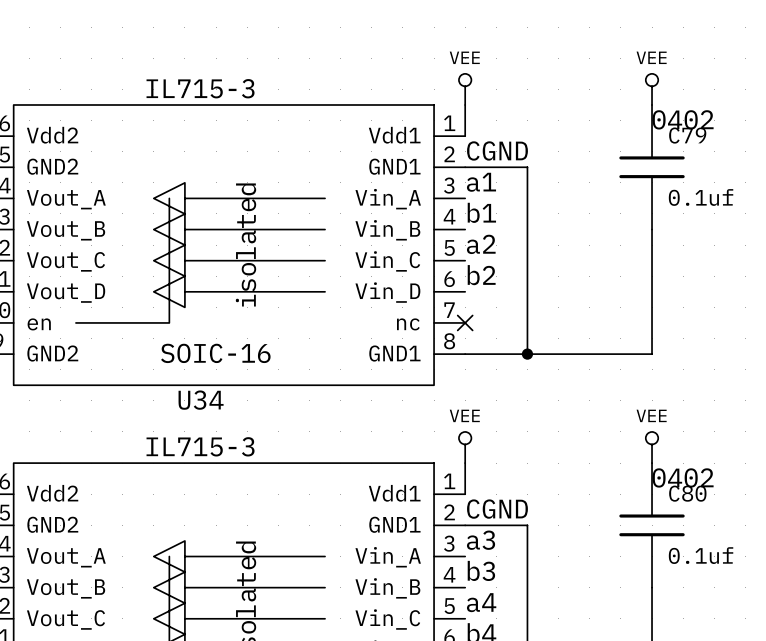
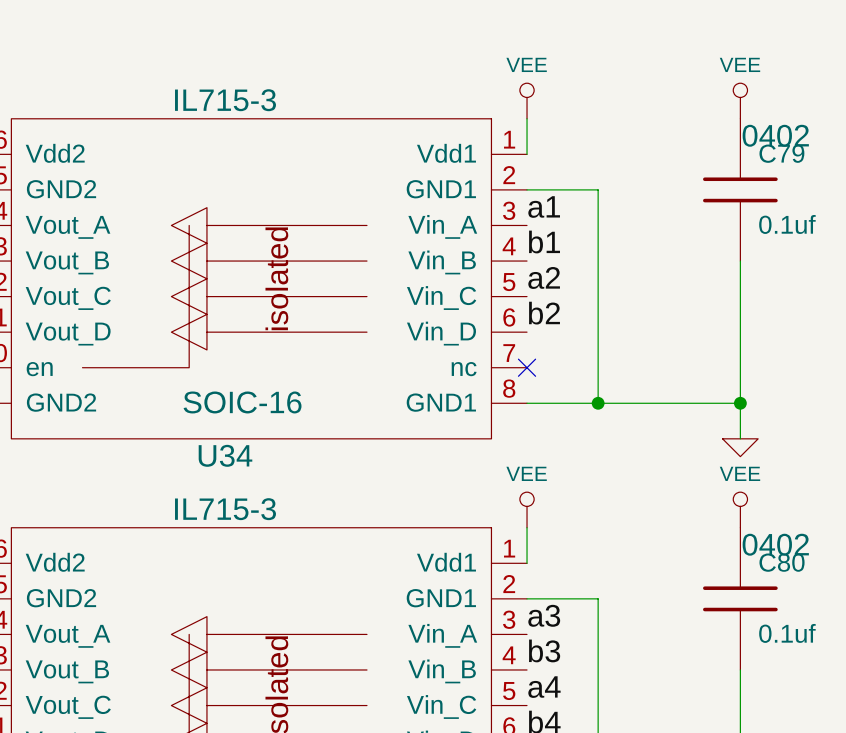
label: CGND (497, 150) -> none
wire: none -> (740, 403) (740, 438)
junction: none -> (740, 403)
power symbol: none -> (740, 447)
label: CGND (497, 509) -> none

